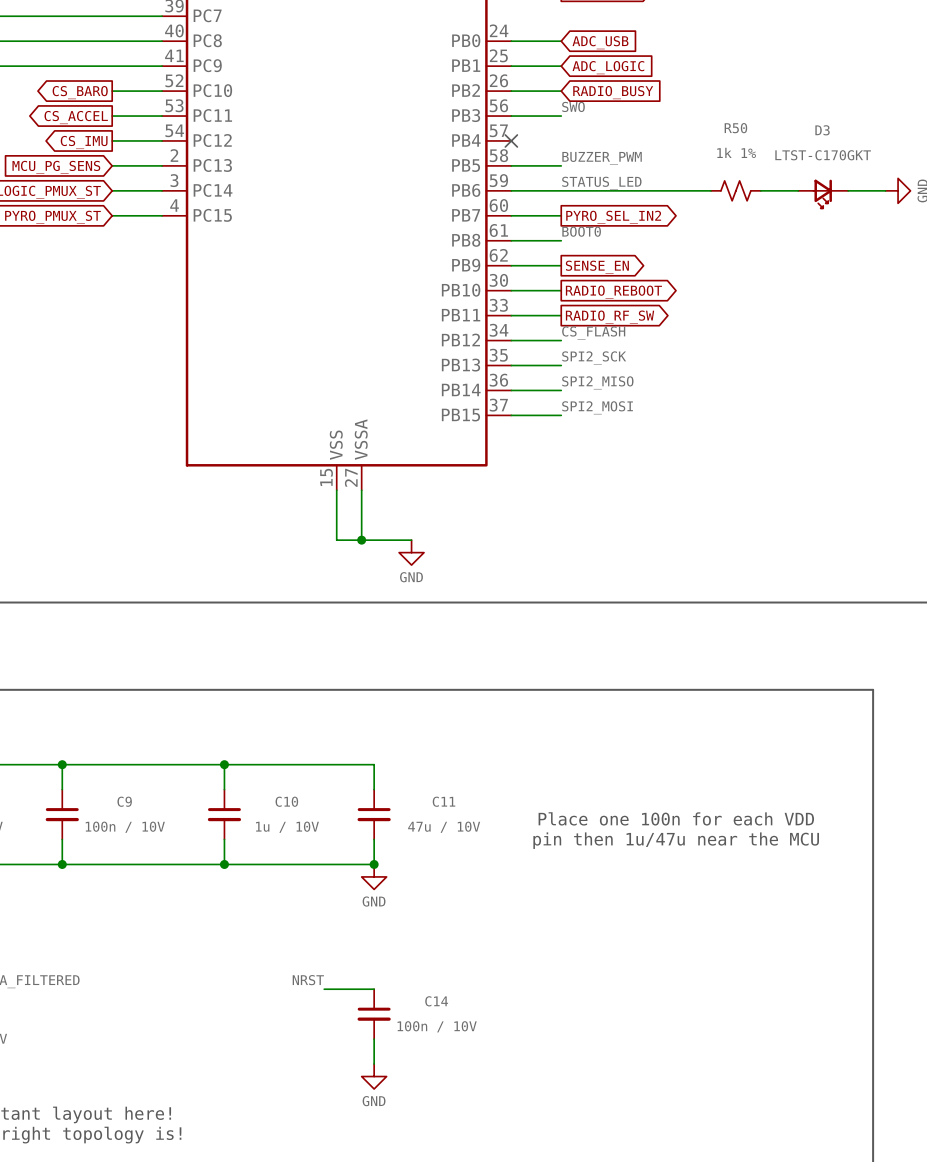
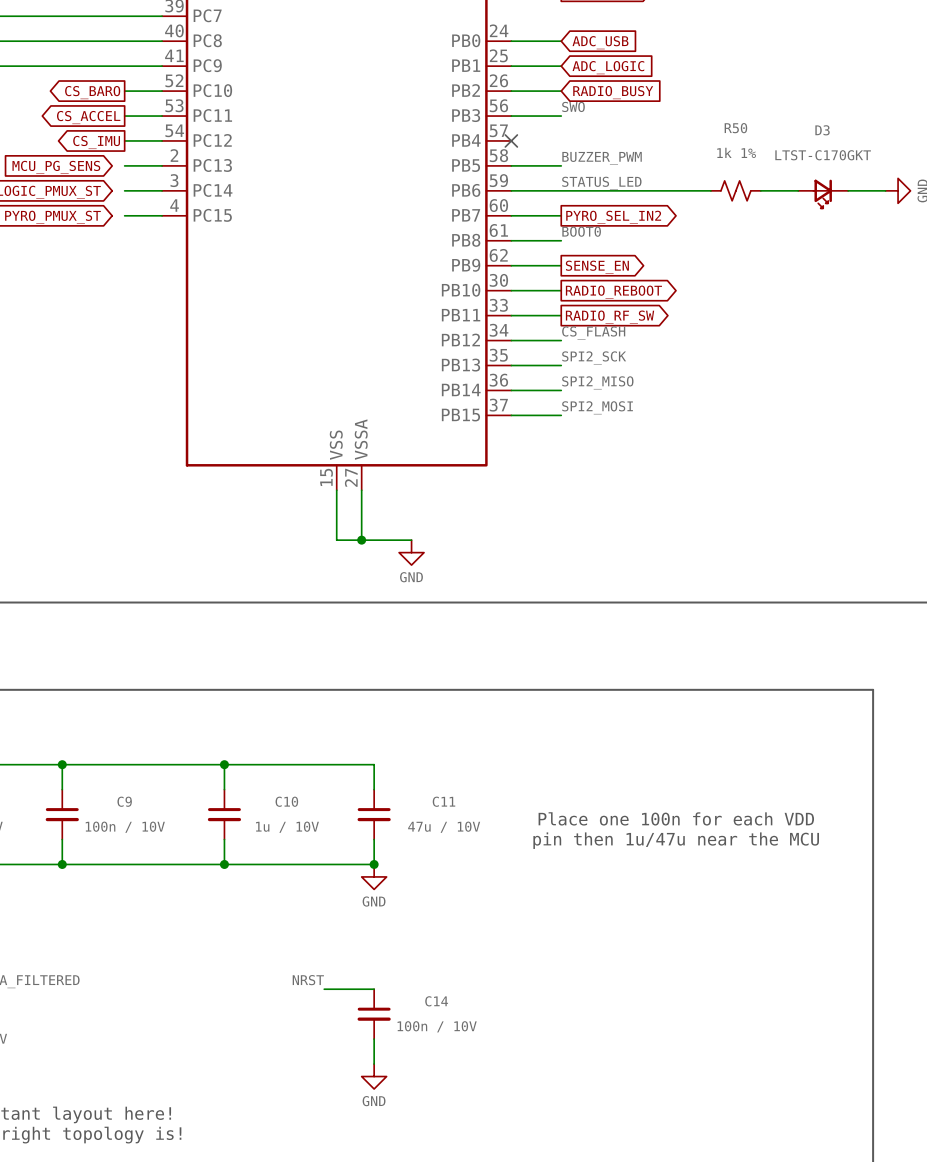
wire: (112, 91) (124, 91) -> none
global label position: CS_BARO (80, 92) -> CS_BARO (92, 92)
wire: (112, 116) (124, 116) -> none
global label position: CS_ACCEL (76, 117) -> CS_ACCEL (88, 117)
wire: (112, 140) (124, 140) -> none
global label position: CS_IMU (84, 142) -> CS_IMU (96, 142)
wire: (112, 165) (124, 165) -> none
wire: (112, 190) (124, 190) -> none
wire: (112, 215) (124, 215) -> none

